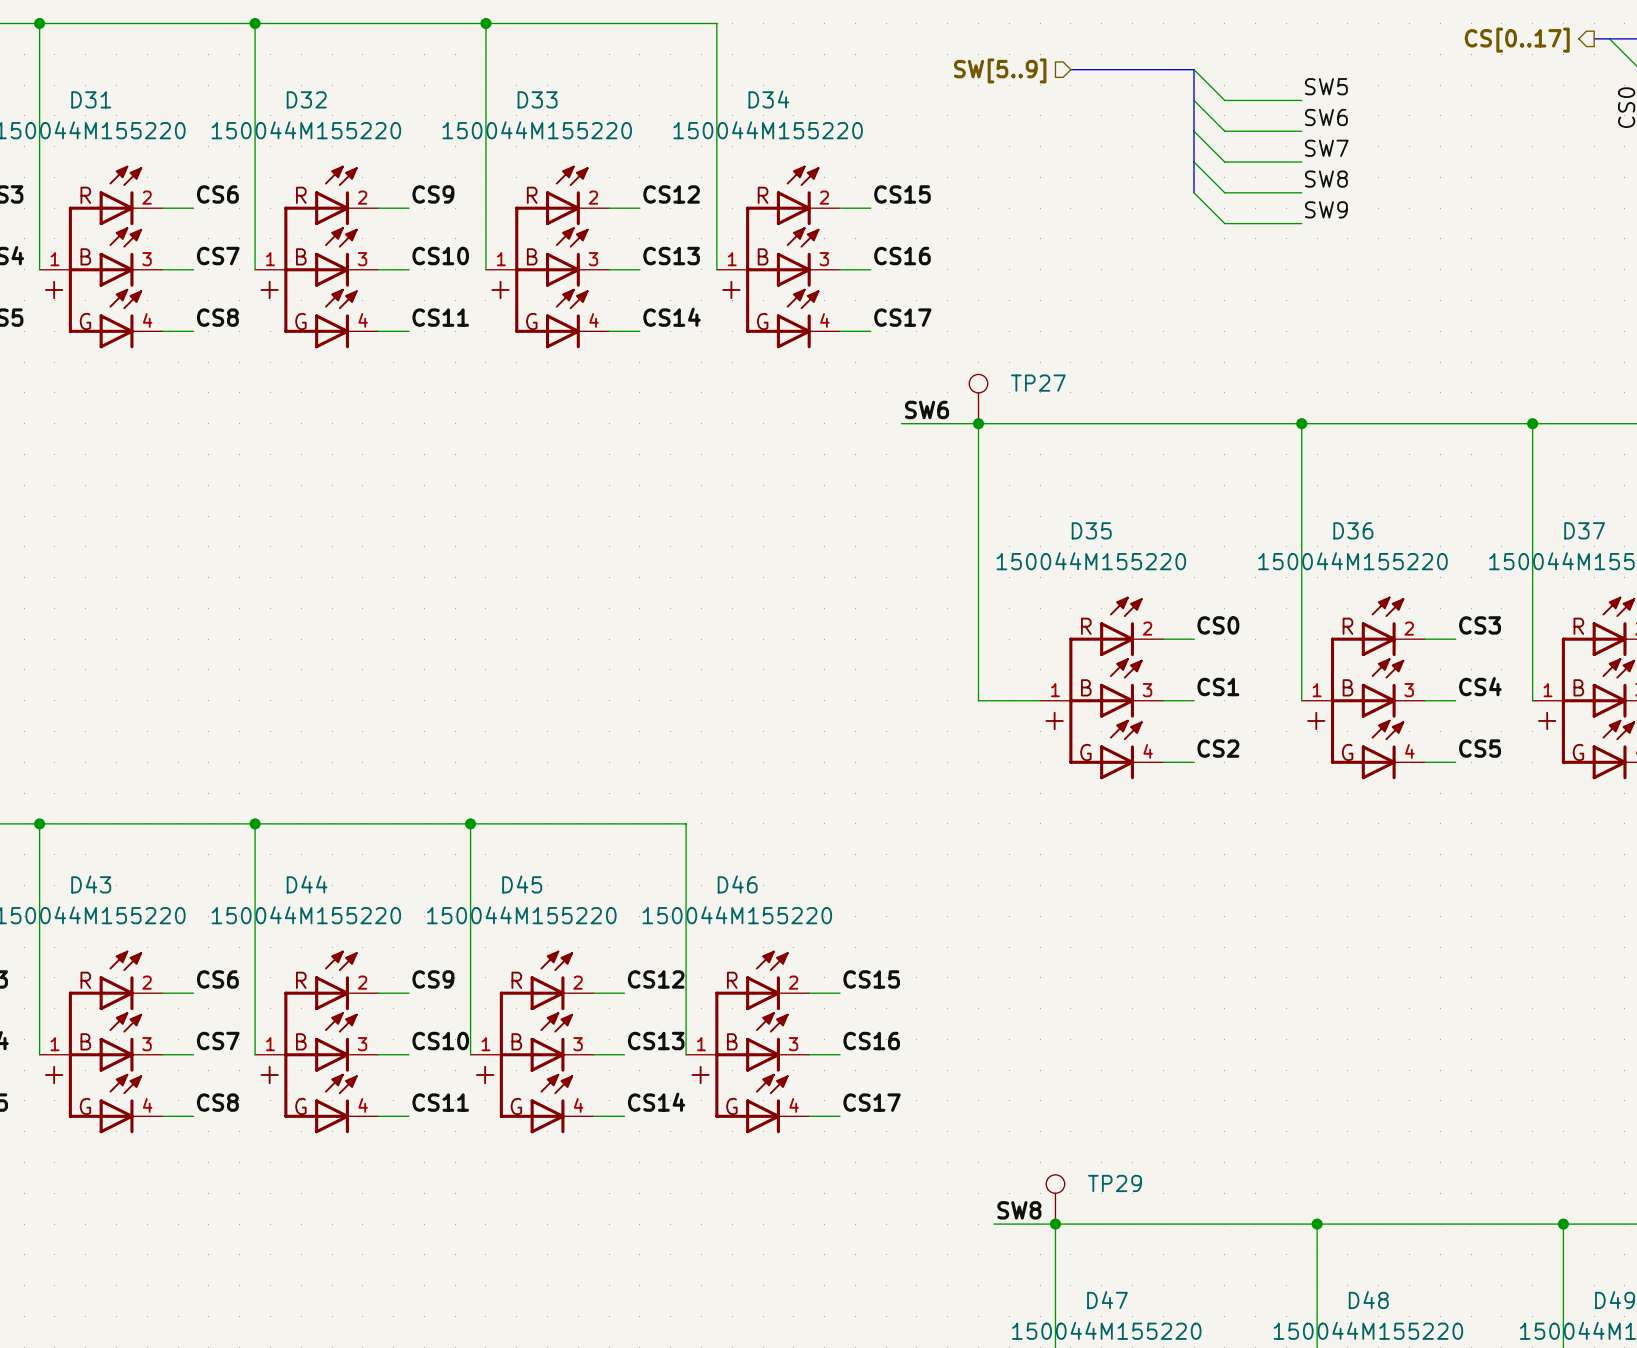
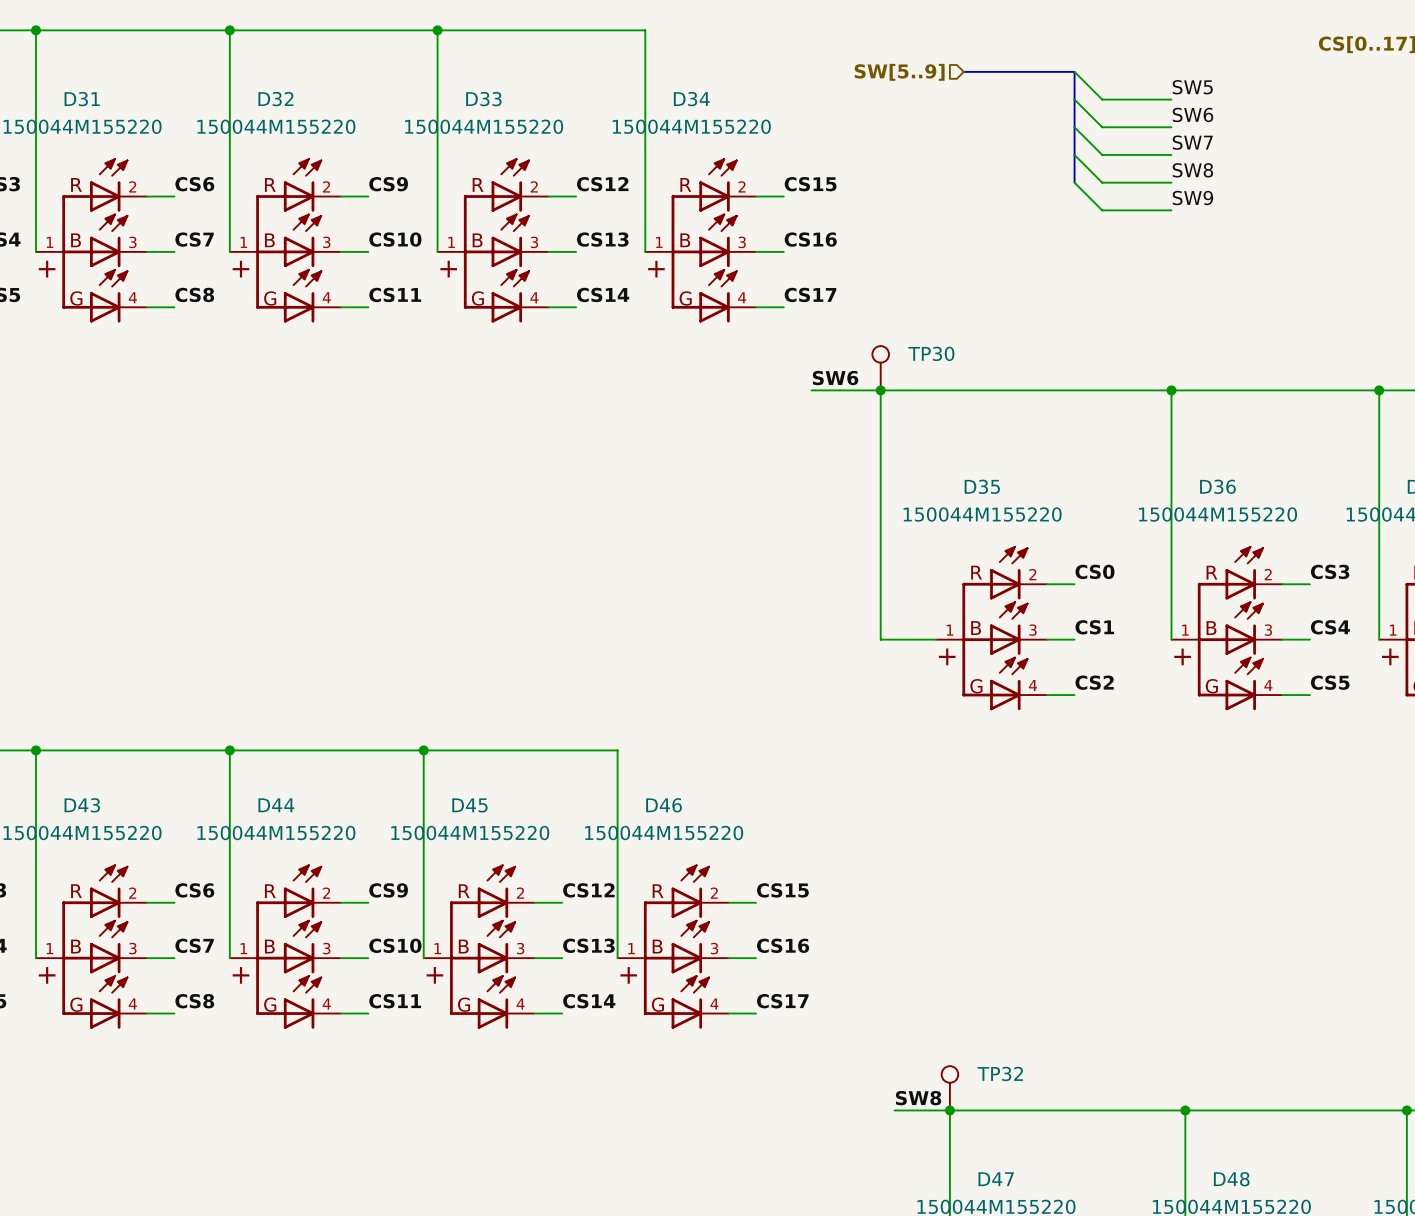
TP27 name: TP27 (1038, 383) -> TP30 (931, 353)
TP29 name: TP29 (1114, 1183) -> TP32 (1000, 1073)

